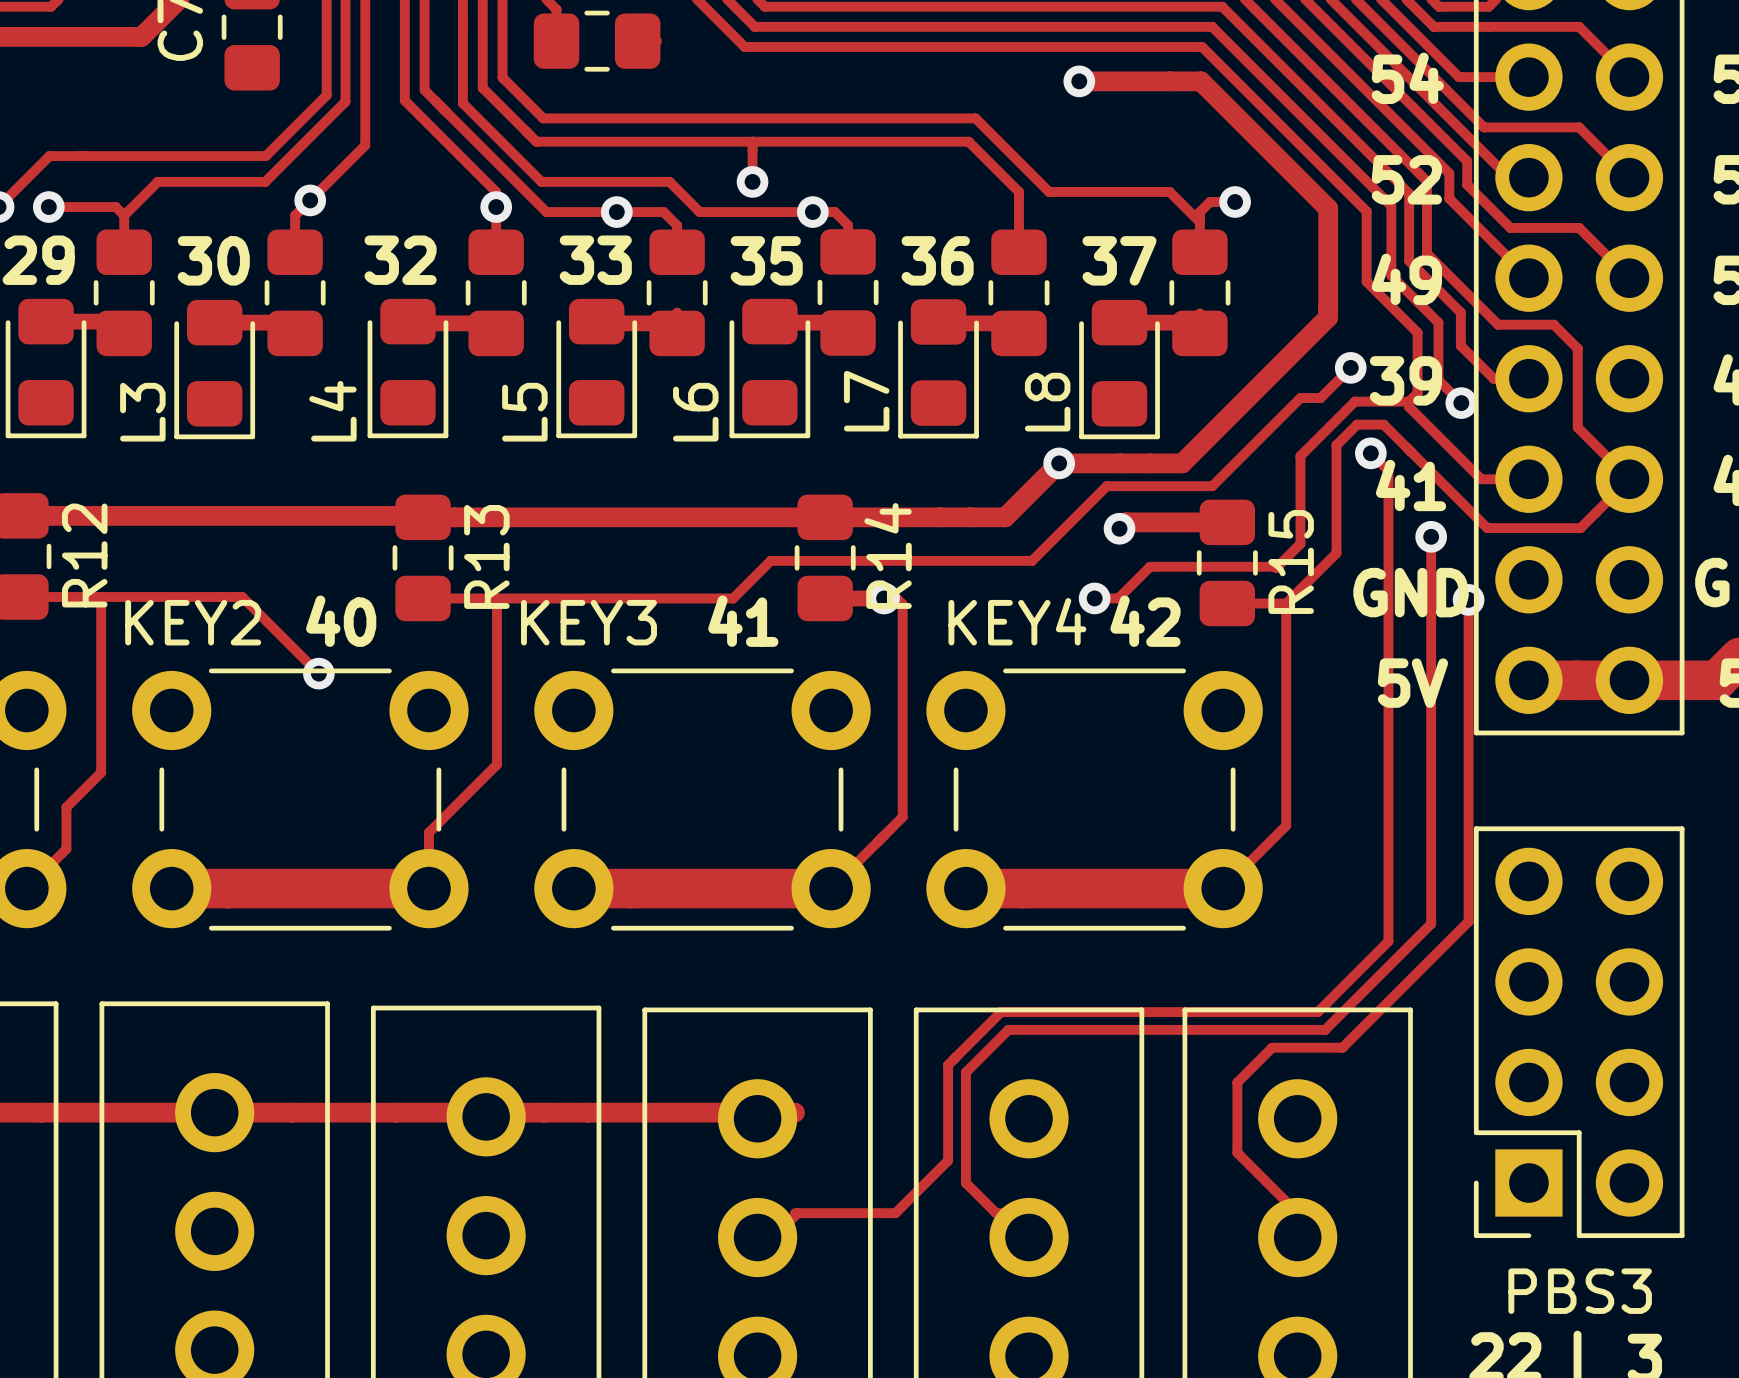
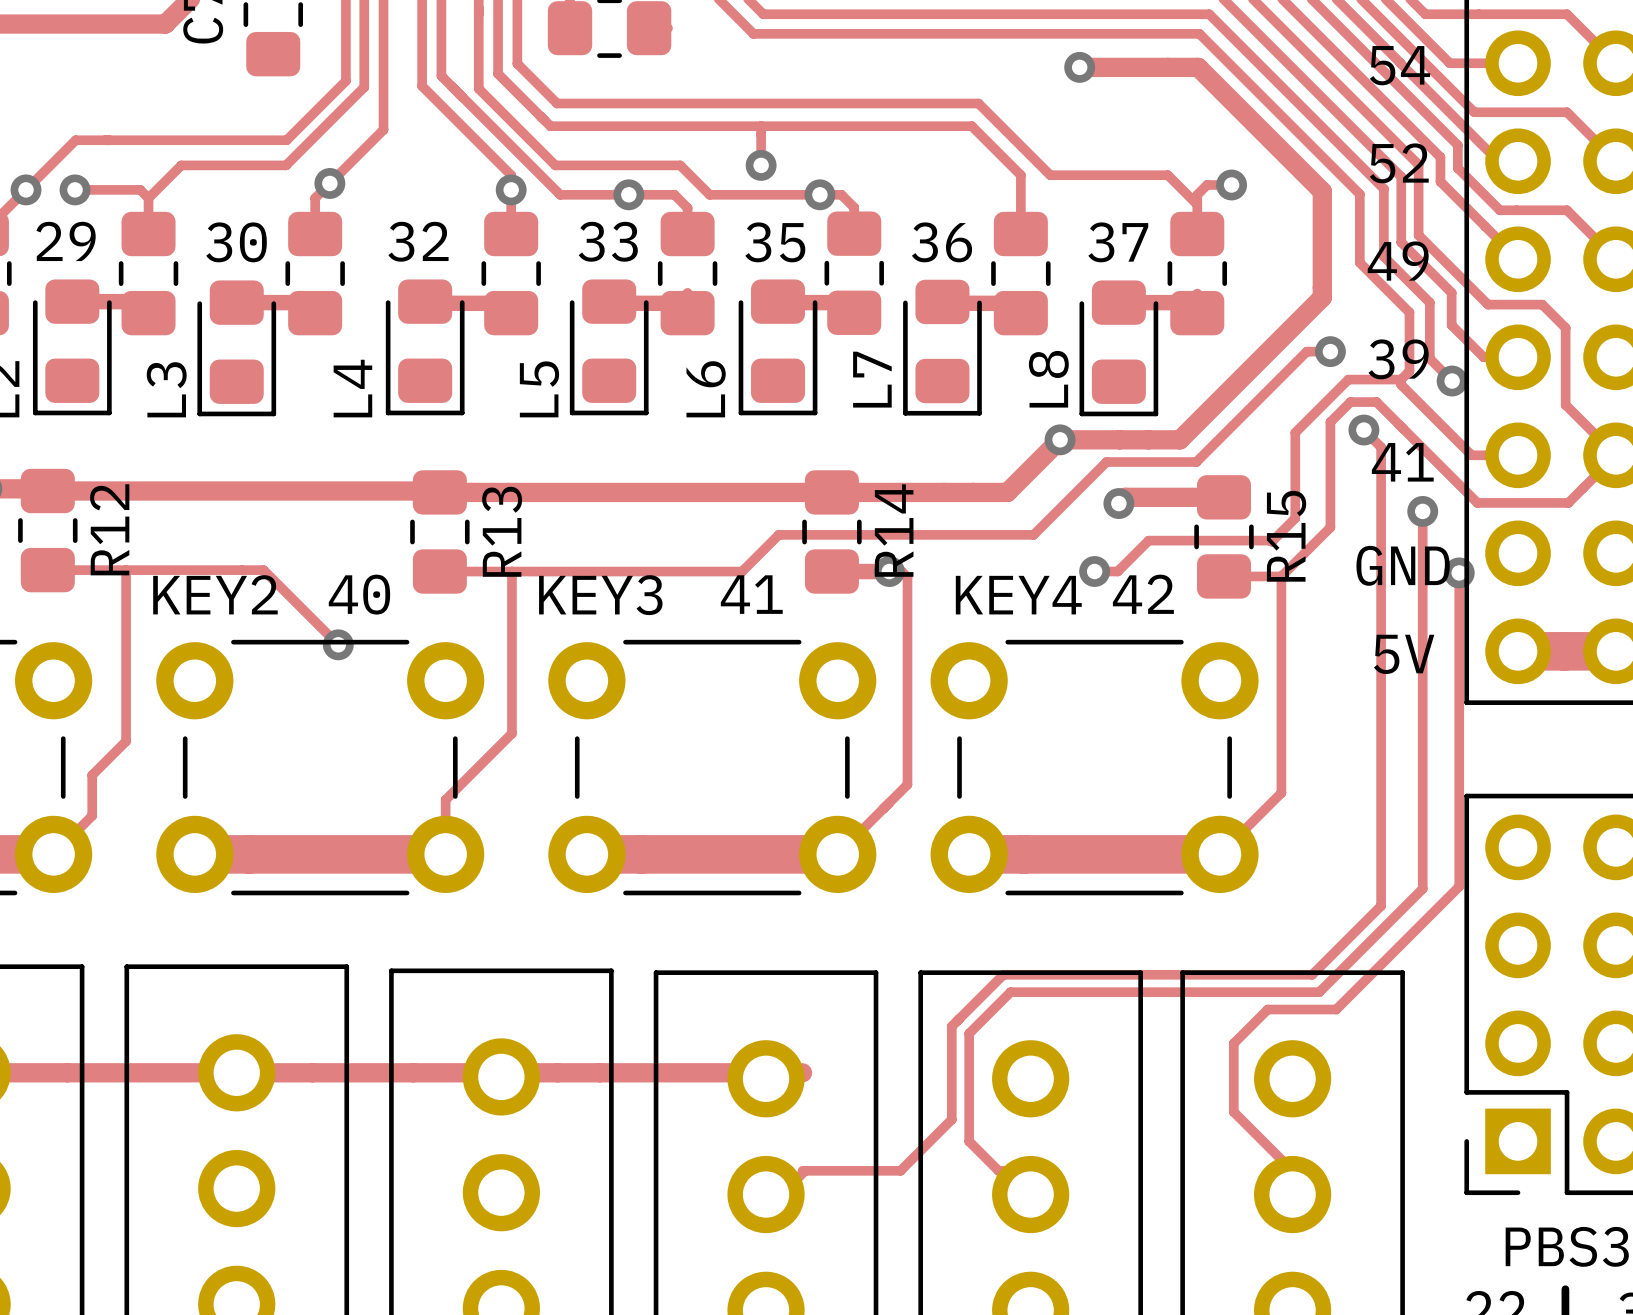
track: (1350, 367) (1320, 398) (1300, 398) (1212, 486) (1199, 486) -> (1330, 351) (1306, 351) (1196, 462)
via position: (1350, 367) -> (1330, 351)

